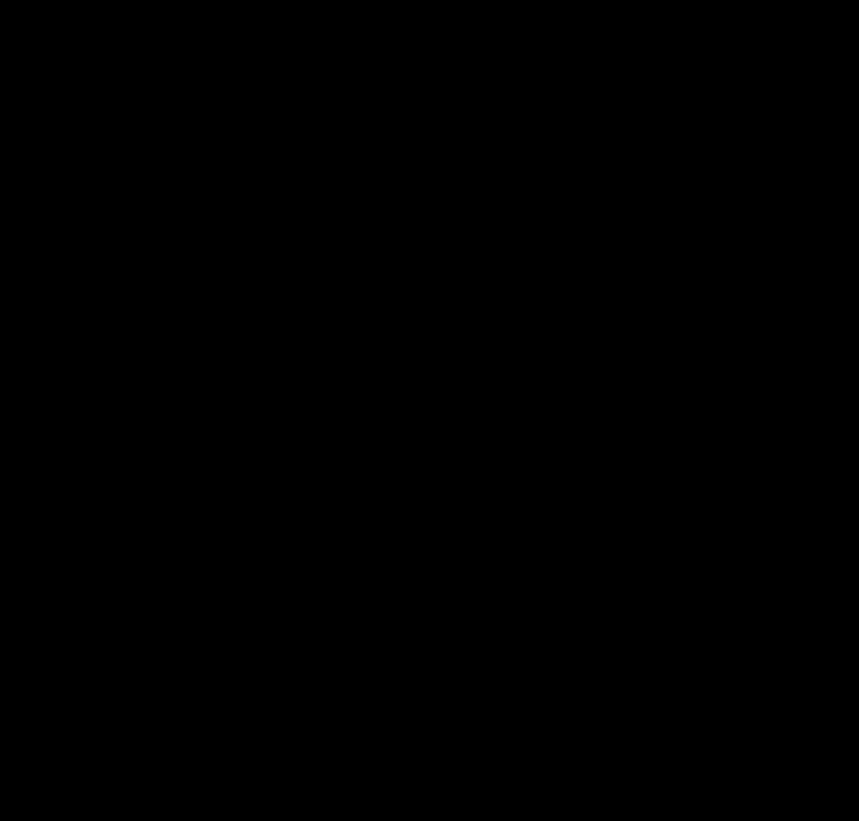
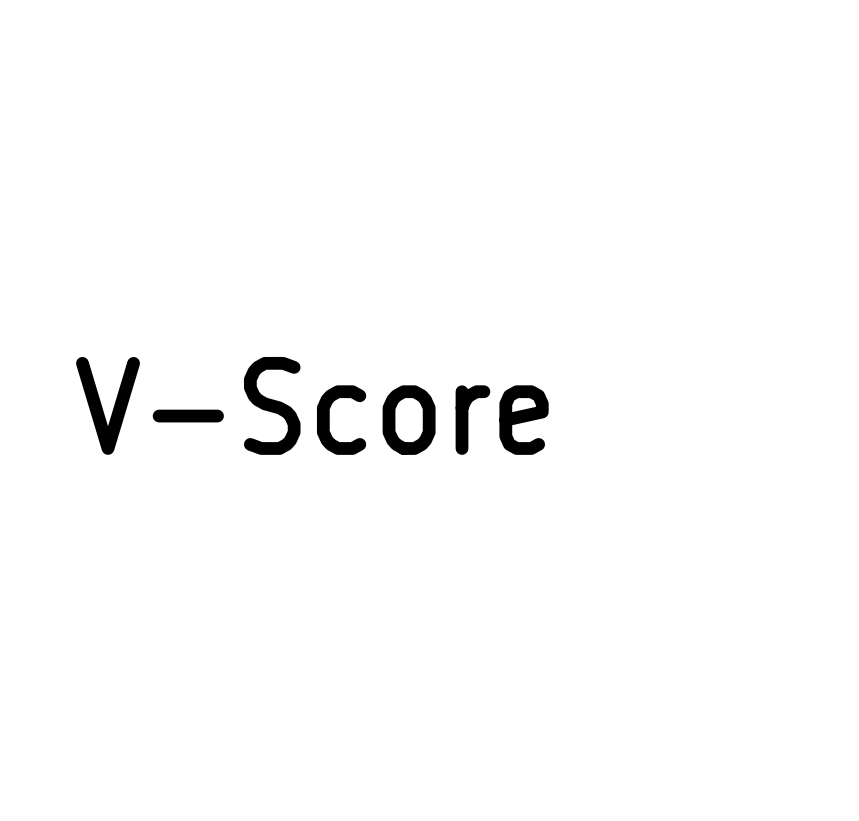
text: none -> V-Score (312, 405)

